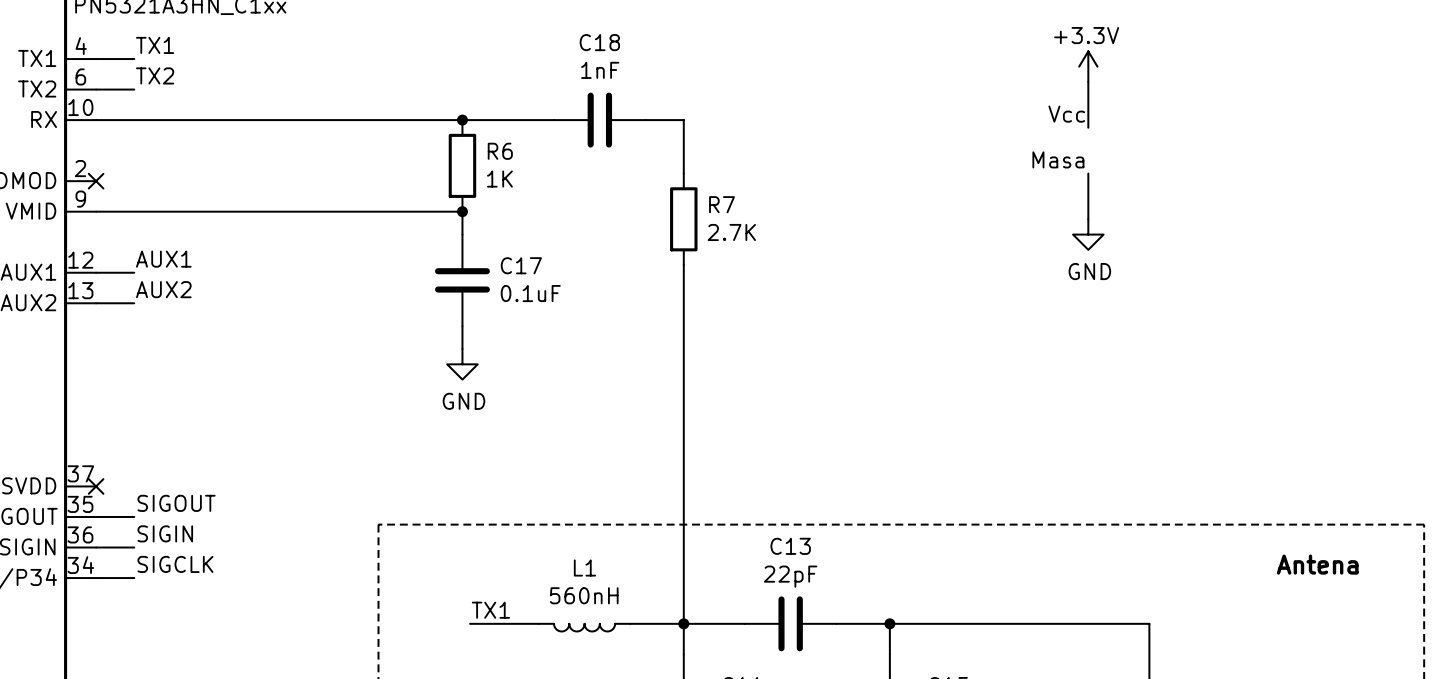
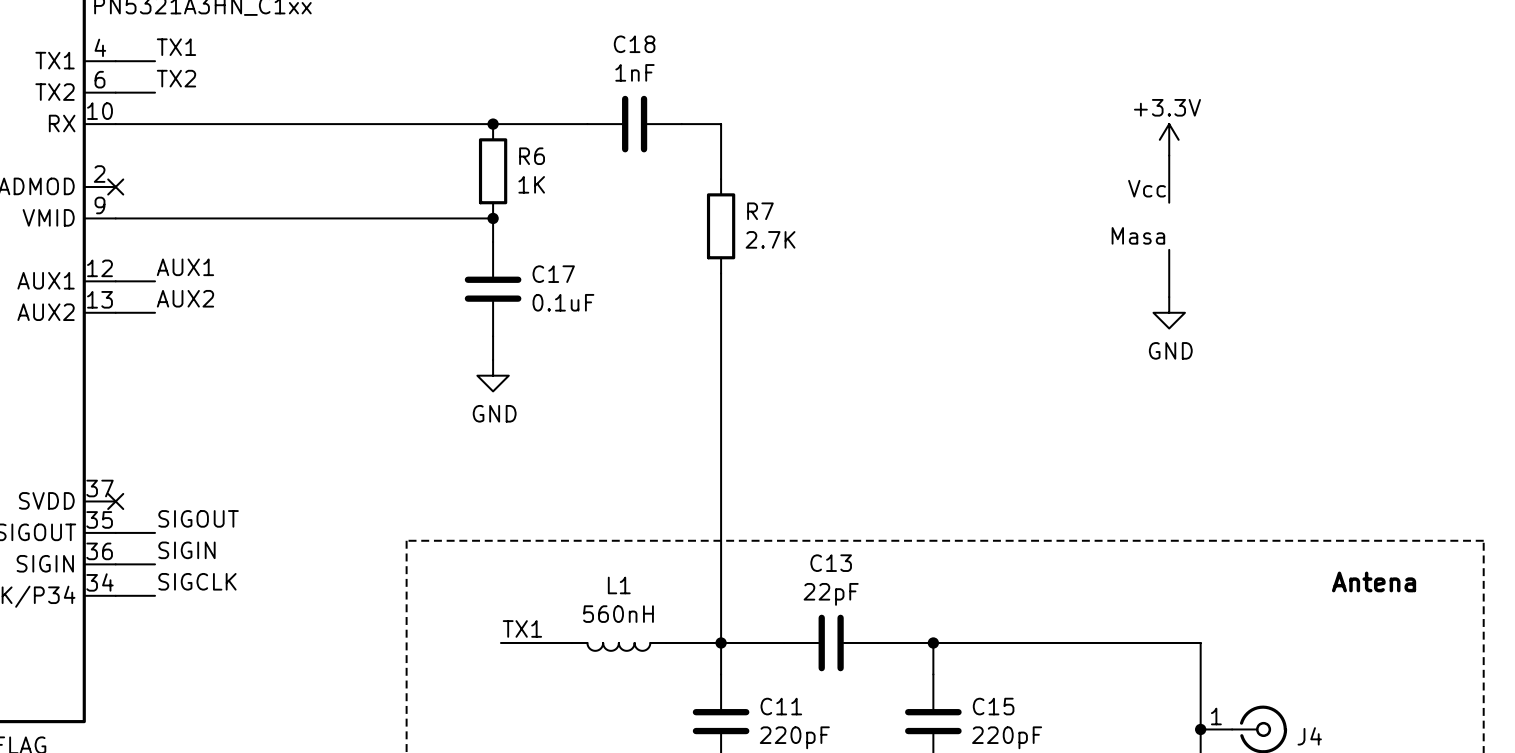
power symbol position: +3.3V (1088, 66) -> +3.3V (1169, 139)
wire: (1088, 81) (1088, 127) -> (1169, 249) (1169, 297)
label position: Vcc (1066, 114) -> Vcc (1147, 188)
label position: Masa (1058, 159) -> Masa (1138, 235)
wire: (1088, 173) (1088, 219) -> (1169, 155) (1169, 202)
power symbol position: GND (1088, 234) -> GND (1169, 312)

